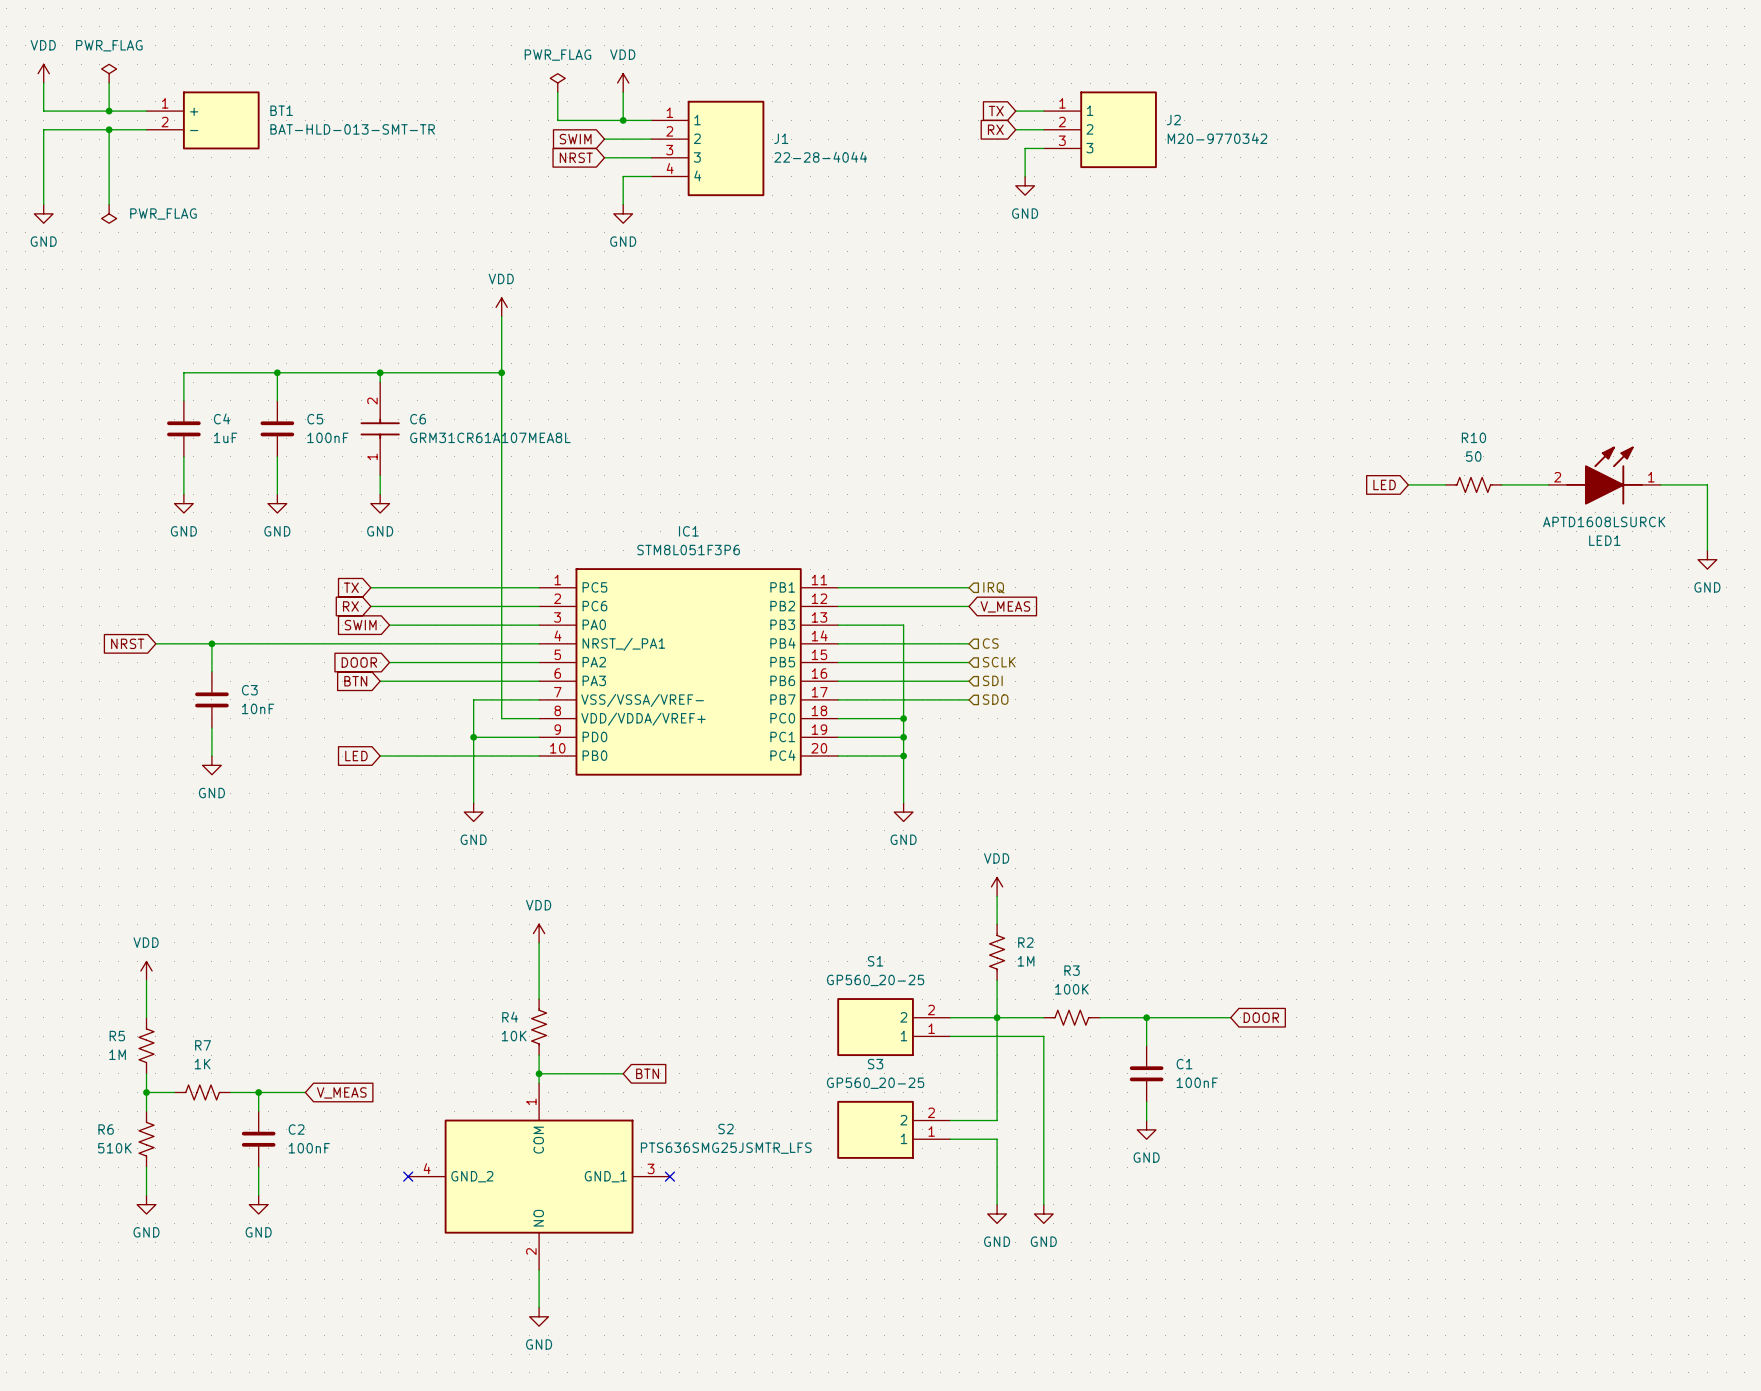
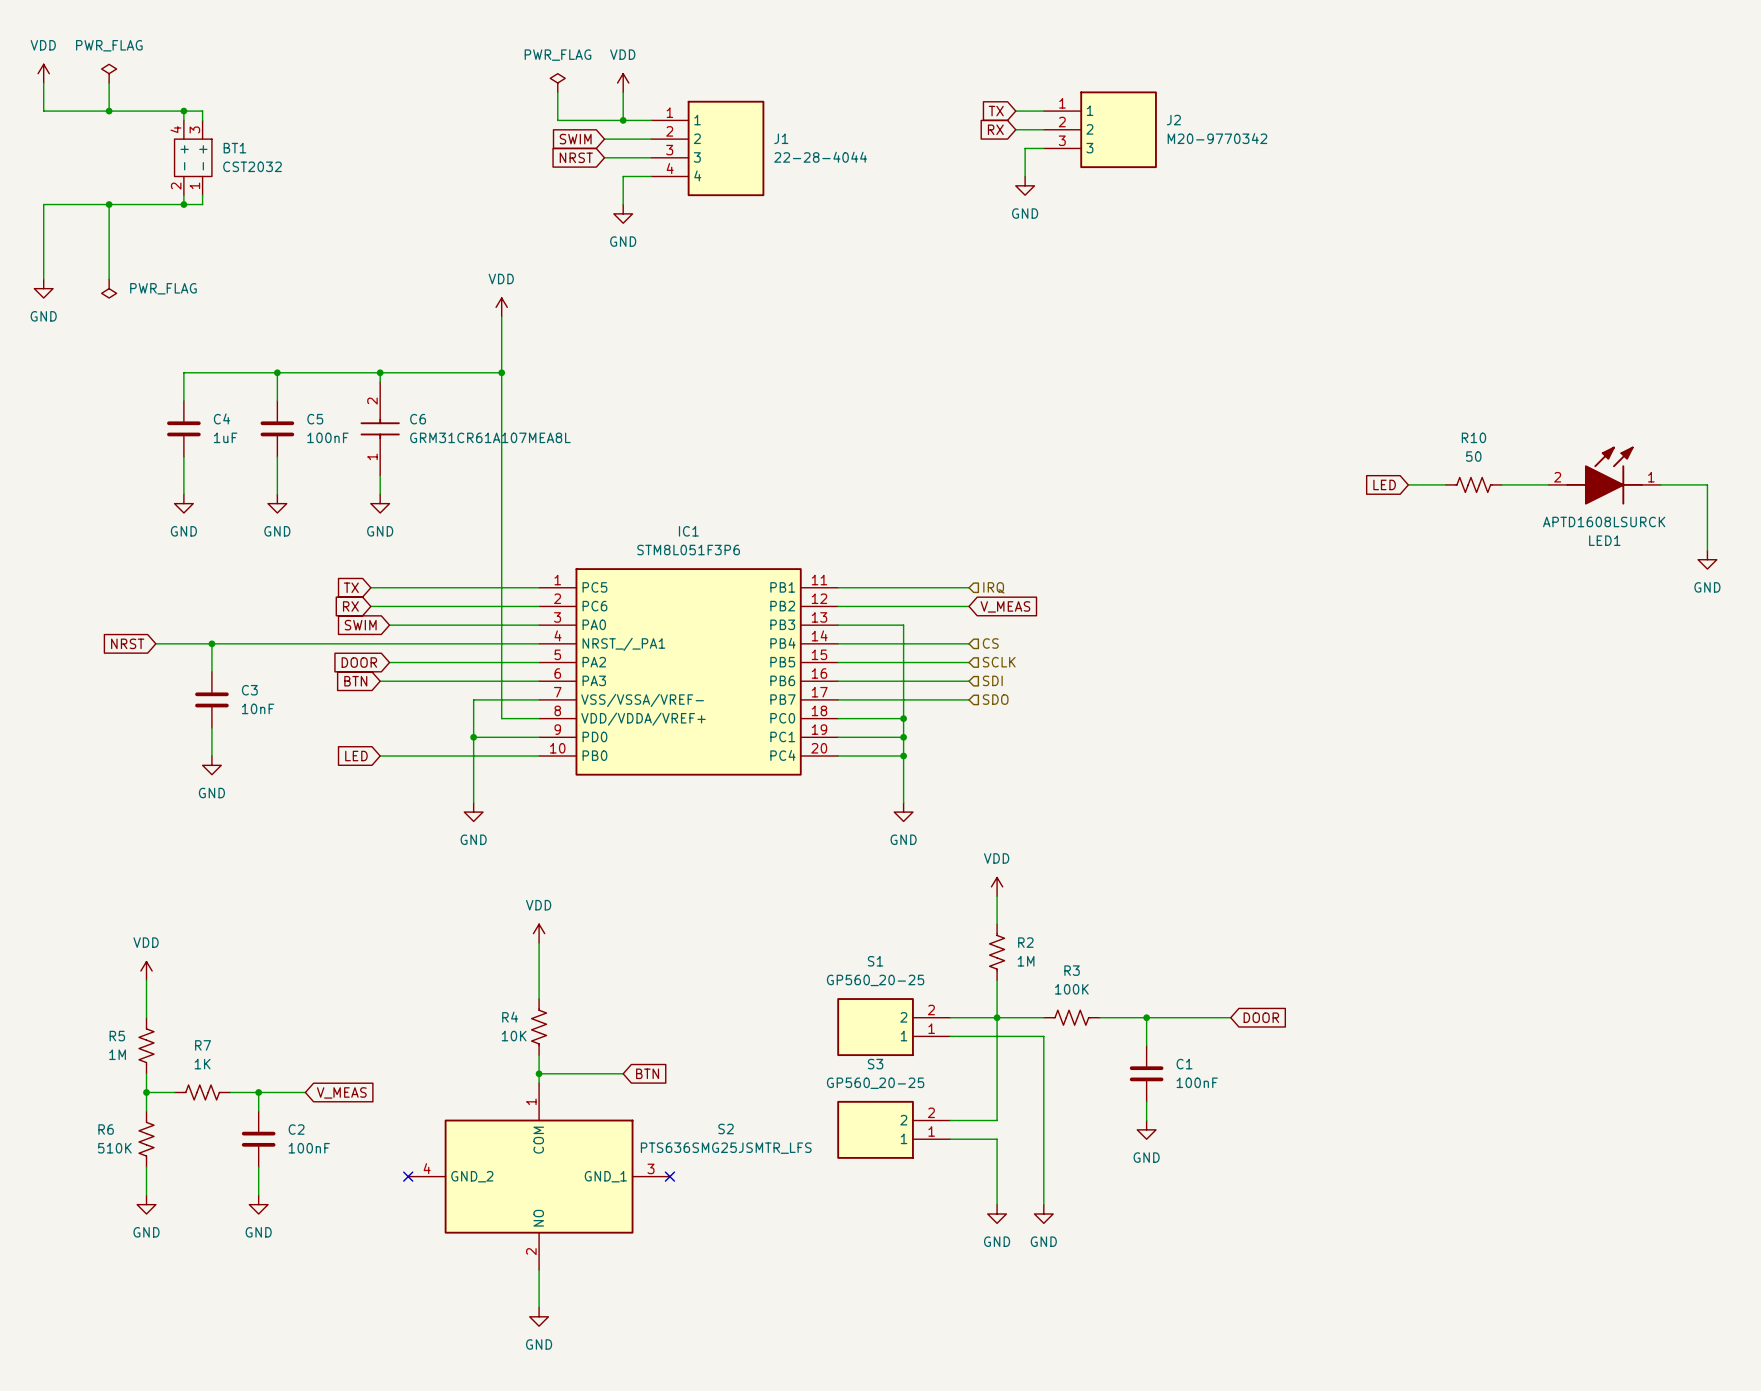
BT1 symbol: [146, 91, 260, 150] -> [174, 120, 212, 196]
BT1 name position: BT1 (281, 110) -> BT1 (234, 148)
junction: none -> (183, 111)
wire: (109, 129) (109, 204) -> (109, 279) (109, 204)
junction: (109, 129) -> none
wire: (146, 129) (43, 129) (43, 204) -> none
BT1 value: BAT-HLD-013-SMT-TR (352, 129) -> CST2032 (252, 166)
wire: none -> (183, 195) (183, 204)
wire: none -> (202, 195) (202, 204) (43, 204) (43, 279)
junction: none -> (109, 204)
junction: none -> (183, 204)
power symbol position: GND (43, 213) -> GND (43, 288)
power symbol position: PWR_FLAG (109, 213) -> PWR_FLAG (109, 288)

